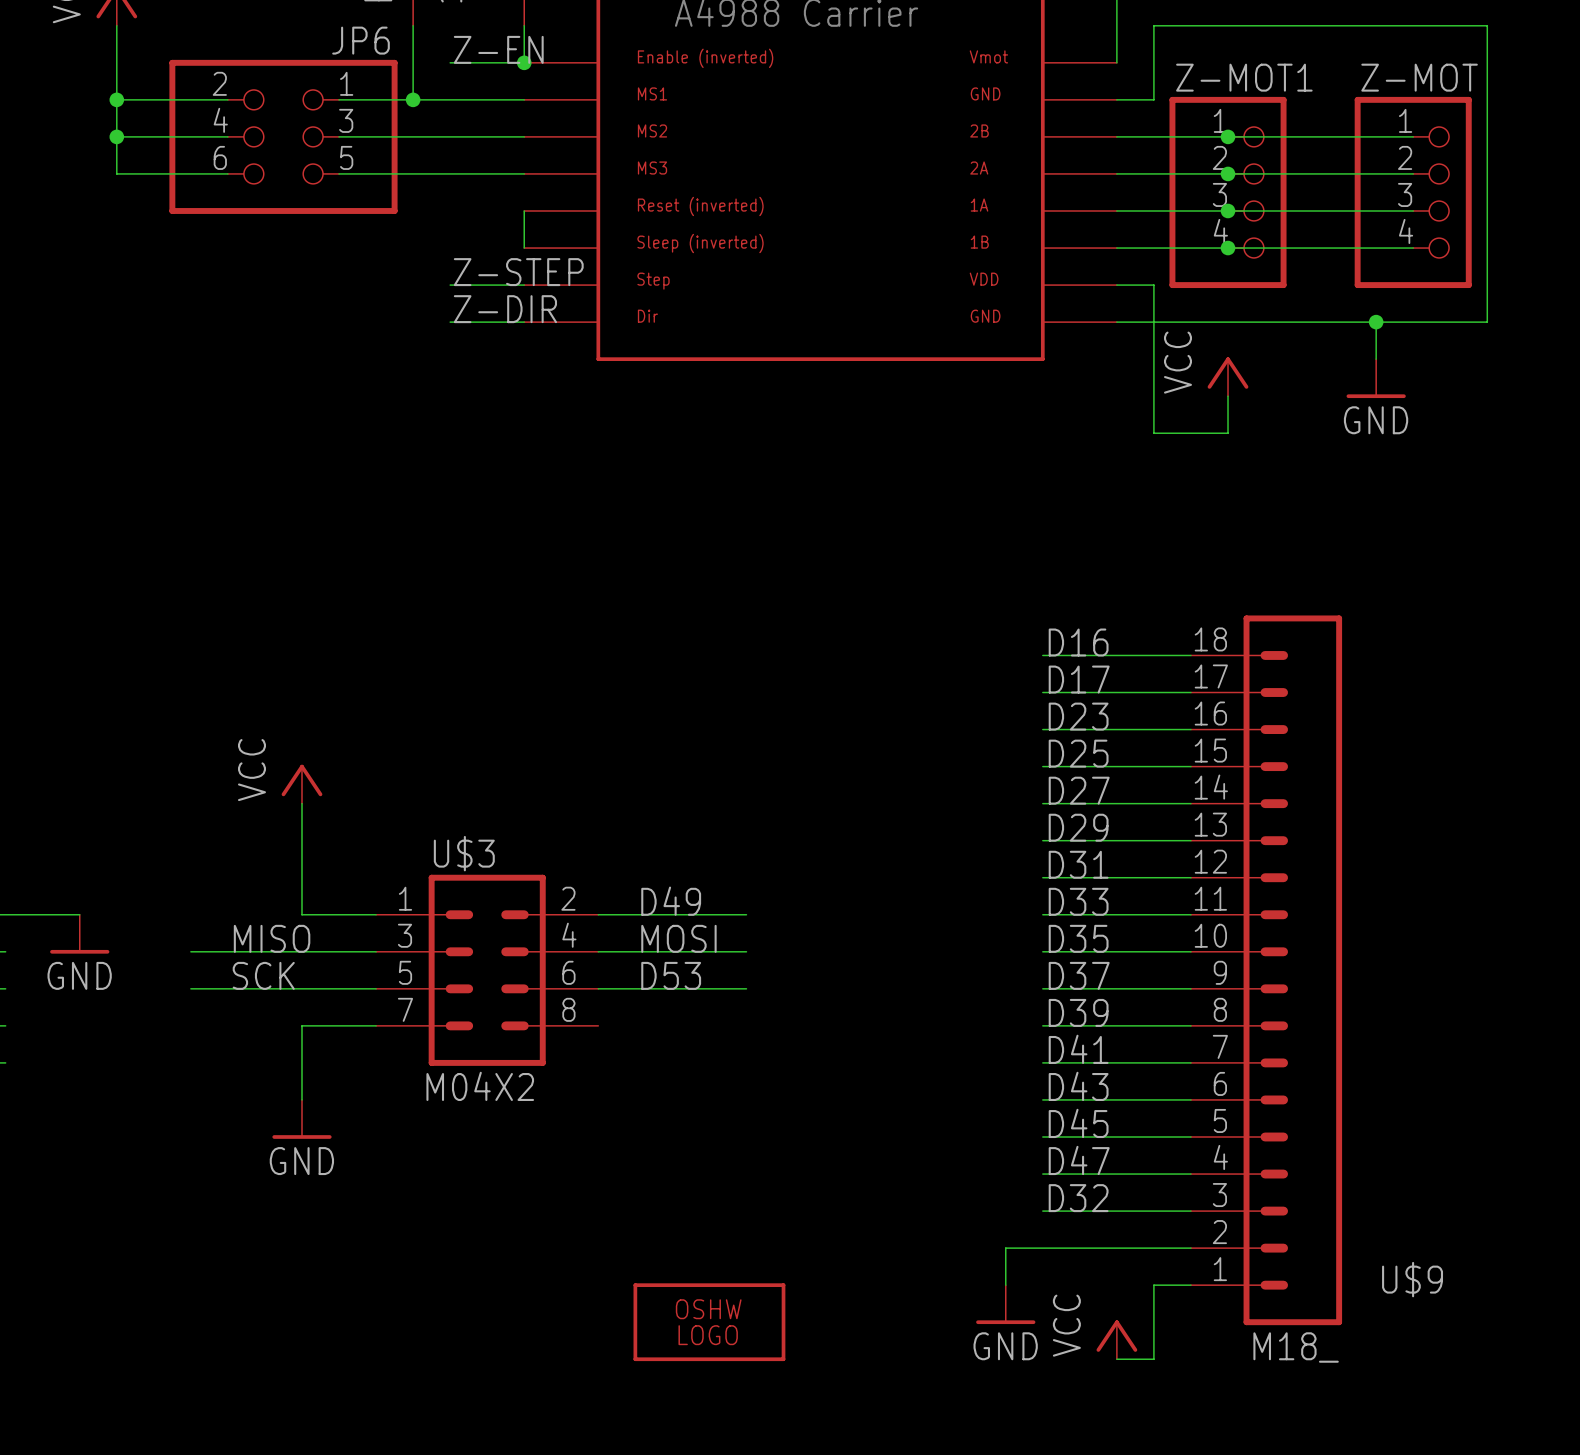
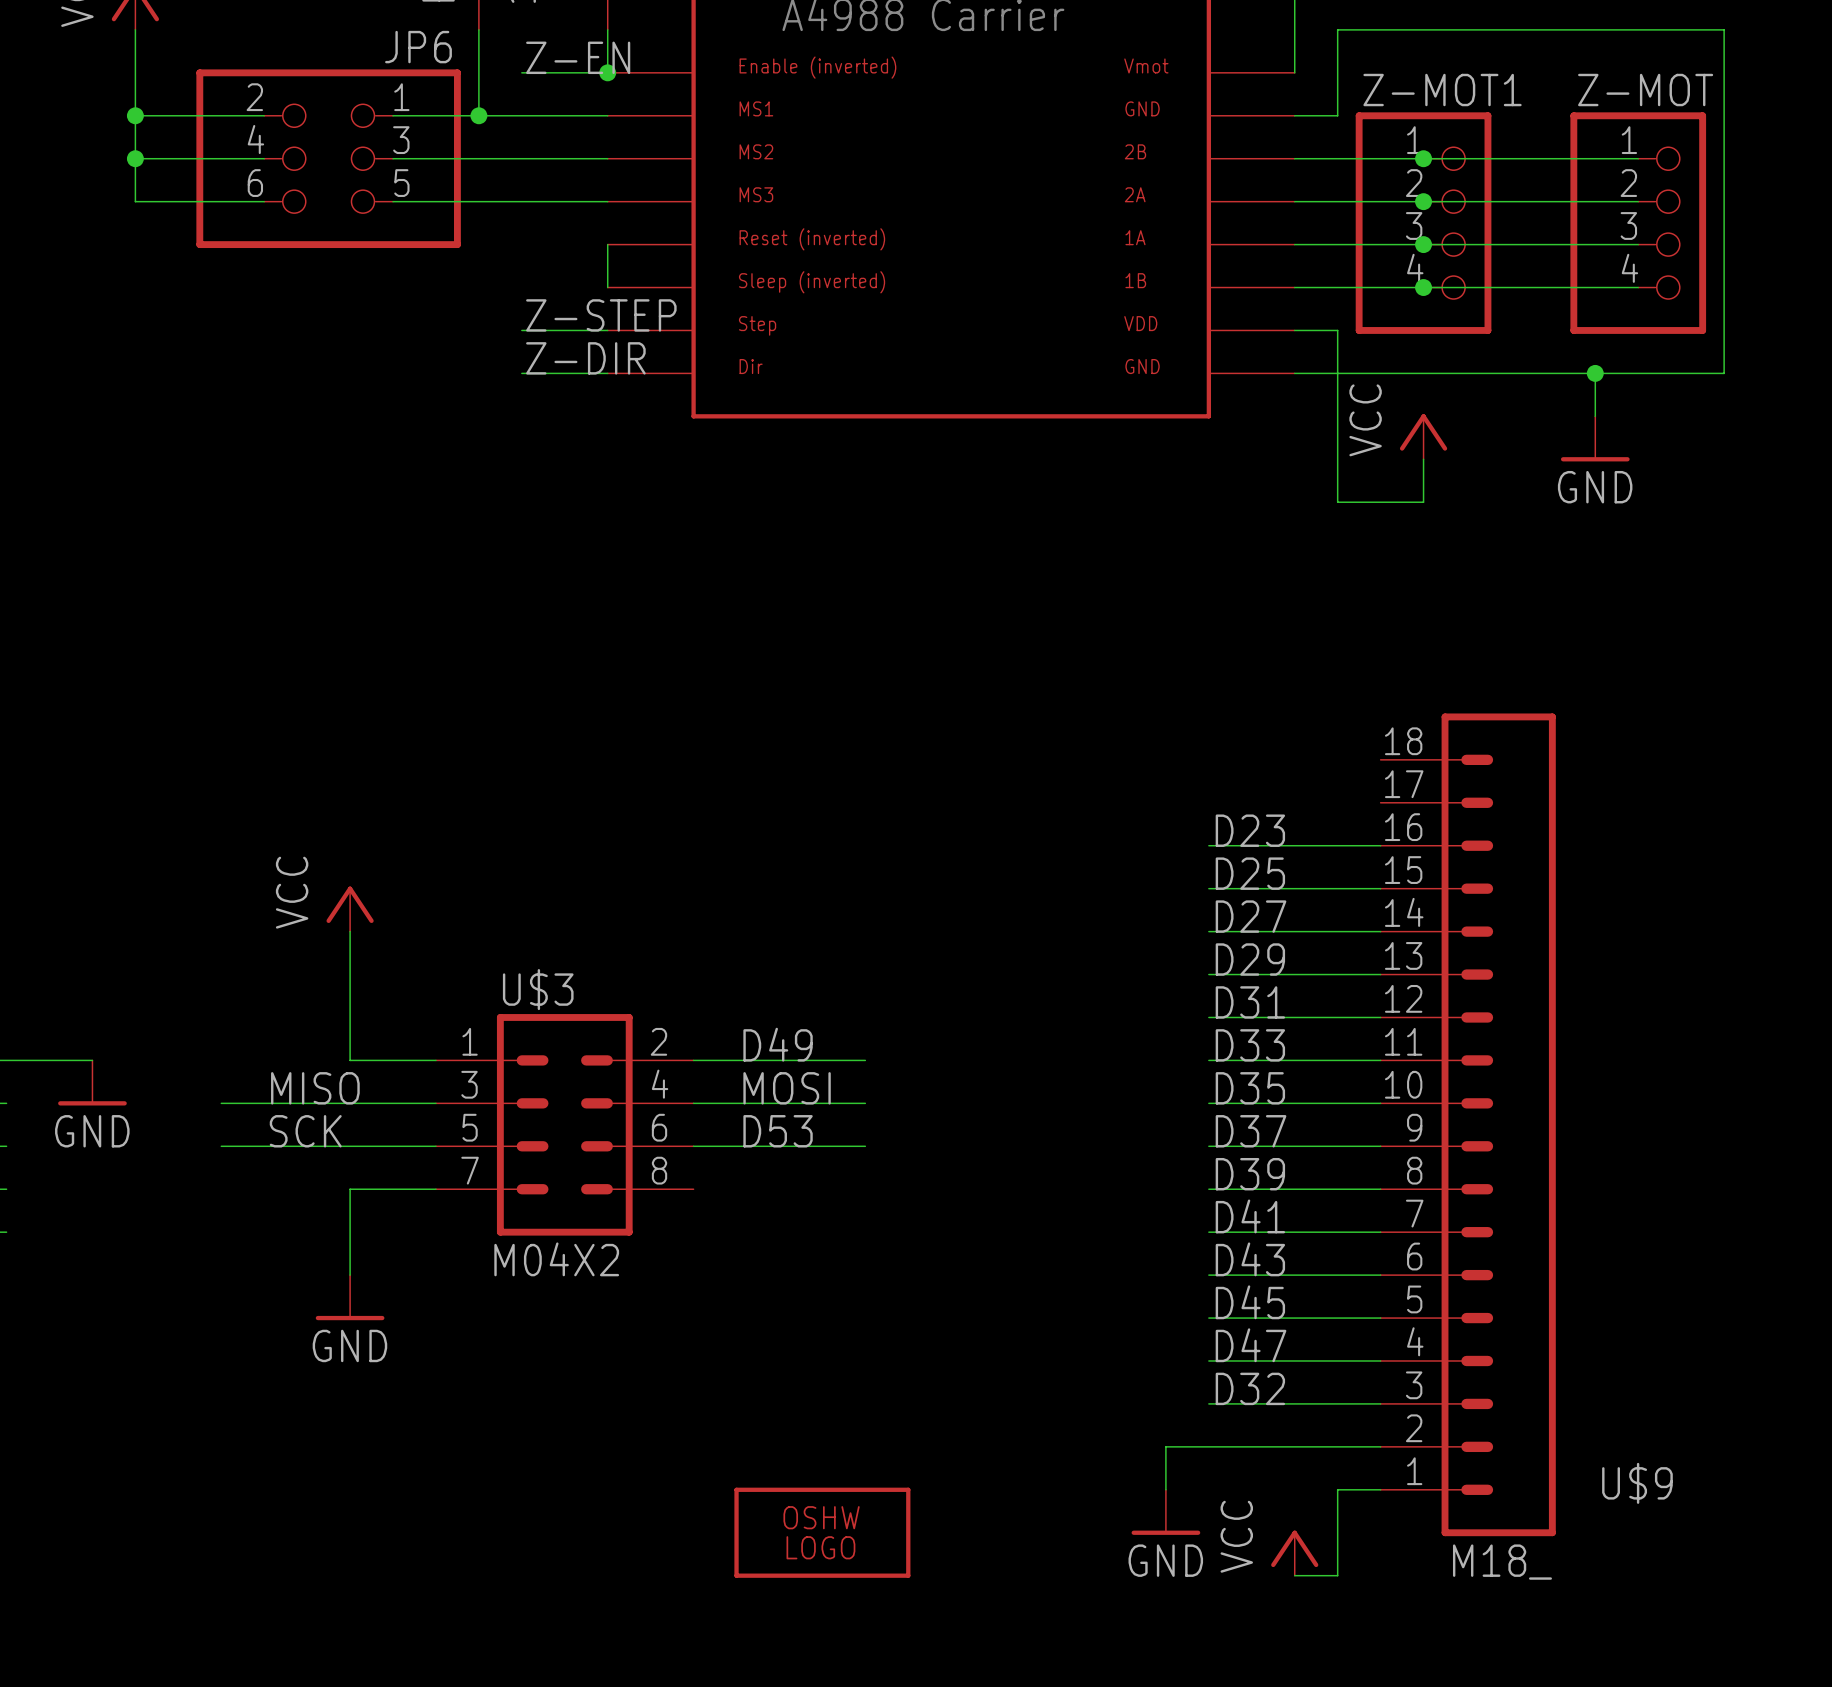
label: D16 (1078, 642) -> none
wire: (1042, 655) (1190, 655) -> none
label: D17 (1079, 679) -> none
wire: (1042, 692) (1190, 692) -> none

